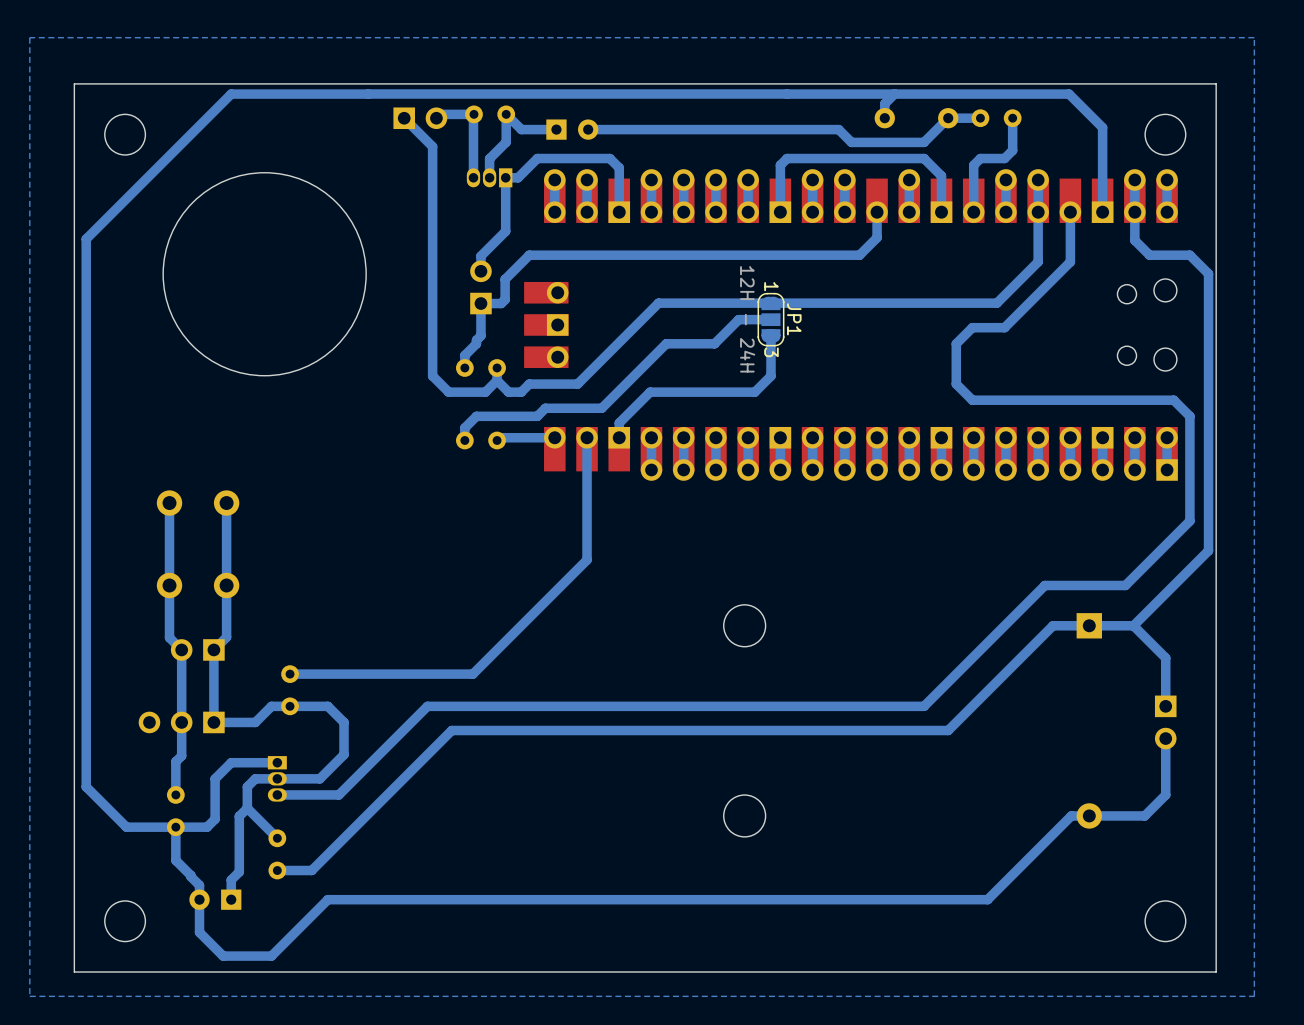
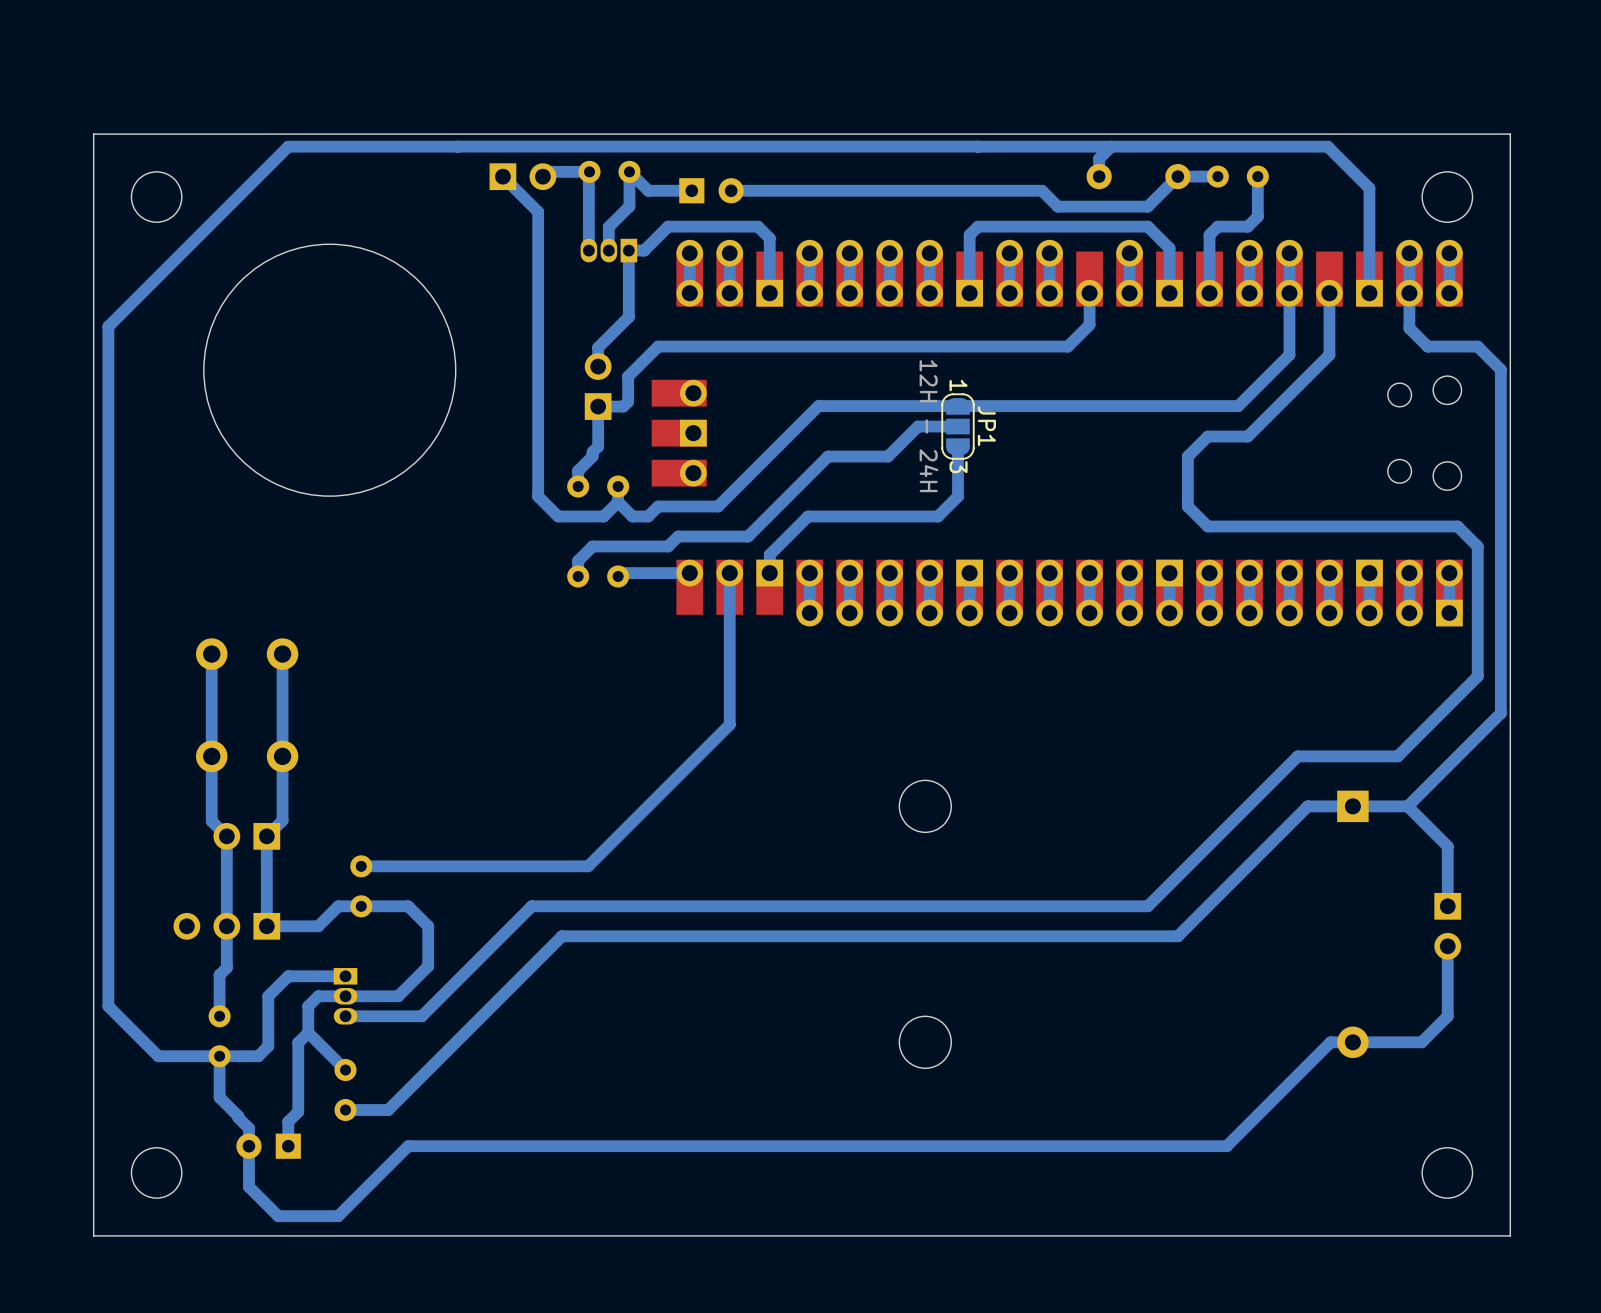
bottom zone outline: (1254, 37) (1254, 996) (29, 996) (29, 37) (1254, 37) -> none

